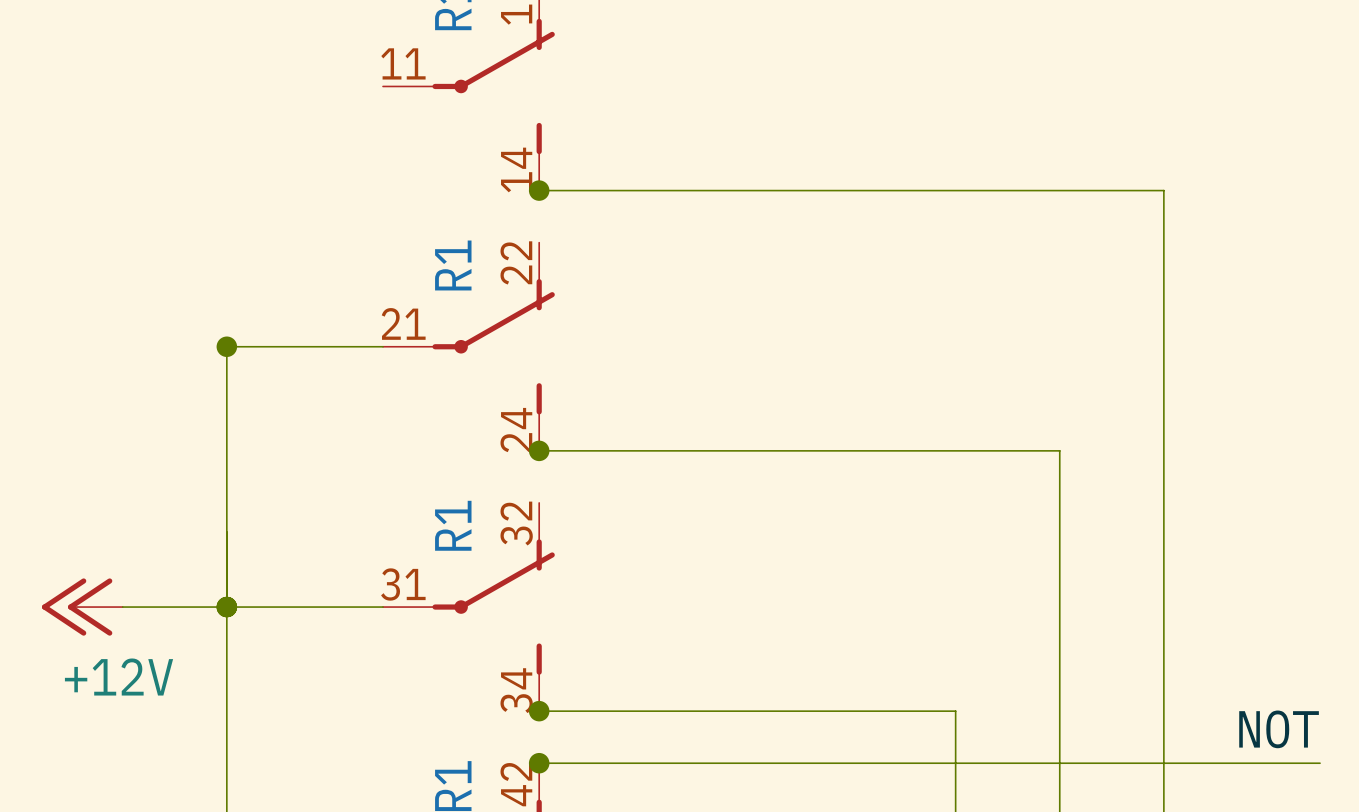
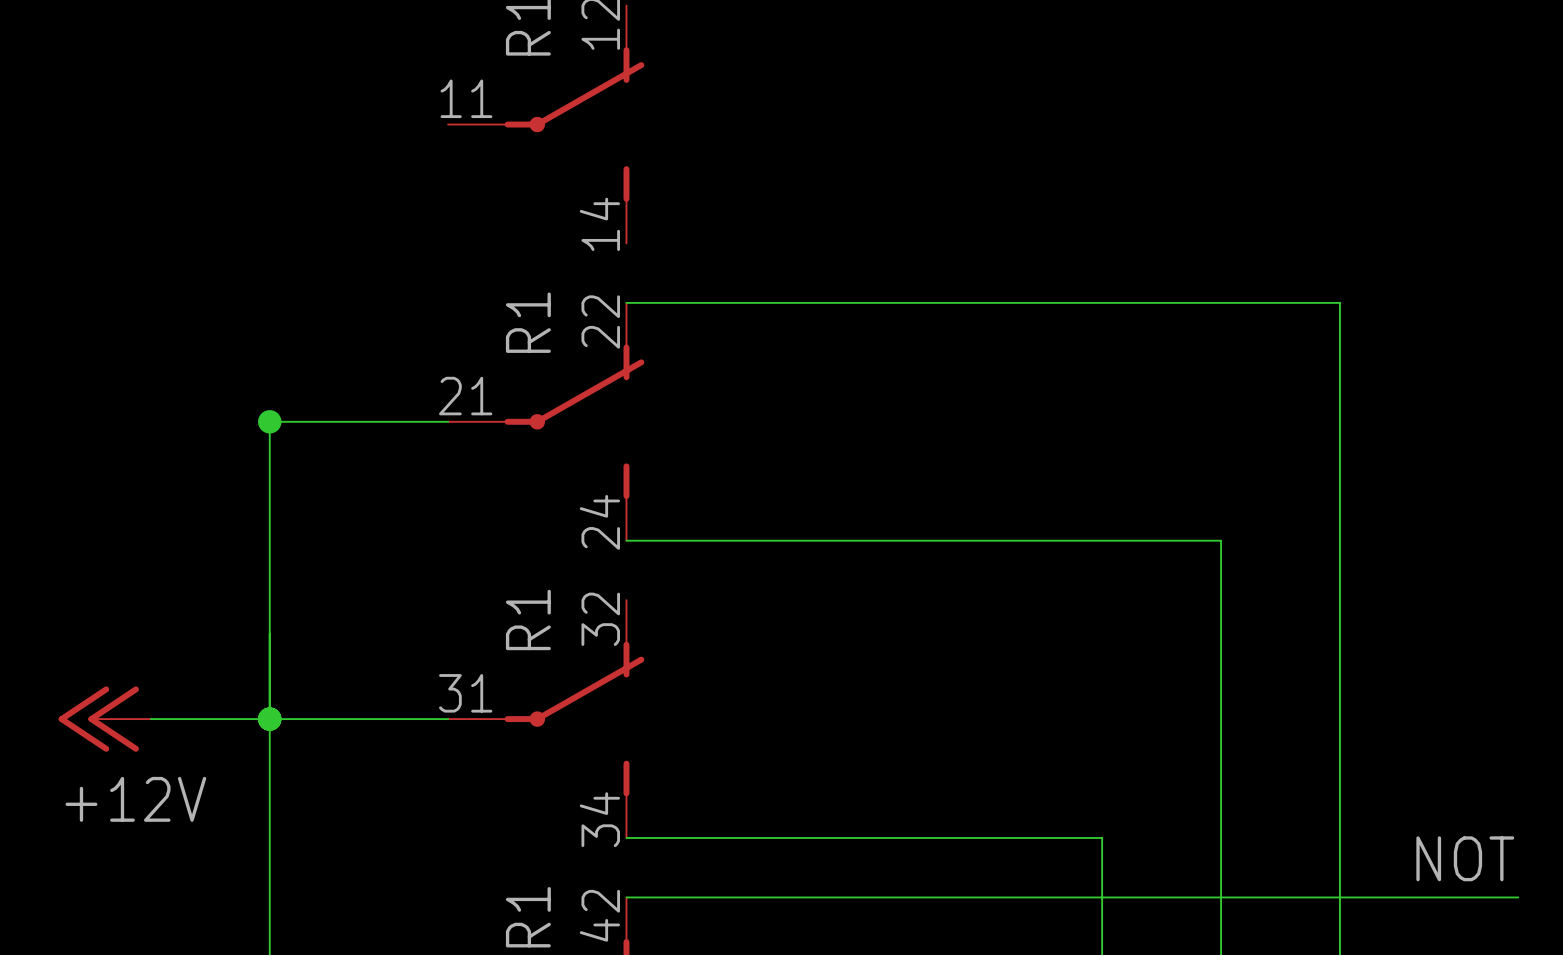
wire: (539, 190) (1163, 190) (1163, 242) -> (626, 302) (1339, 302)
junction: (539, 190) -> none
junction: (539, 450) -> none
junction: (539, 711) -> none
junction: (539, 763) -> none

